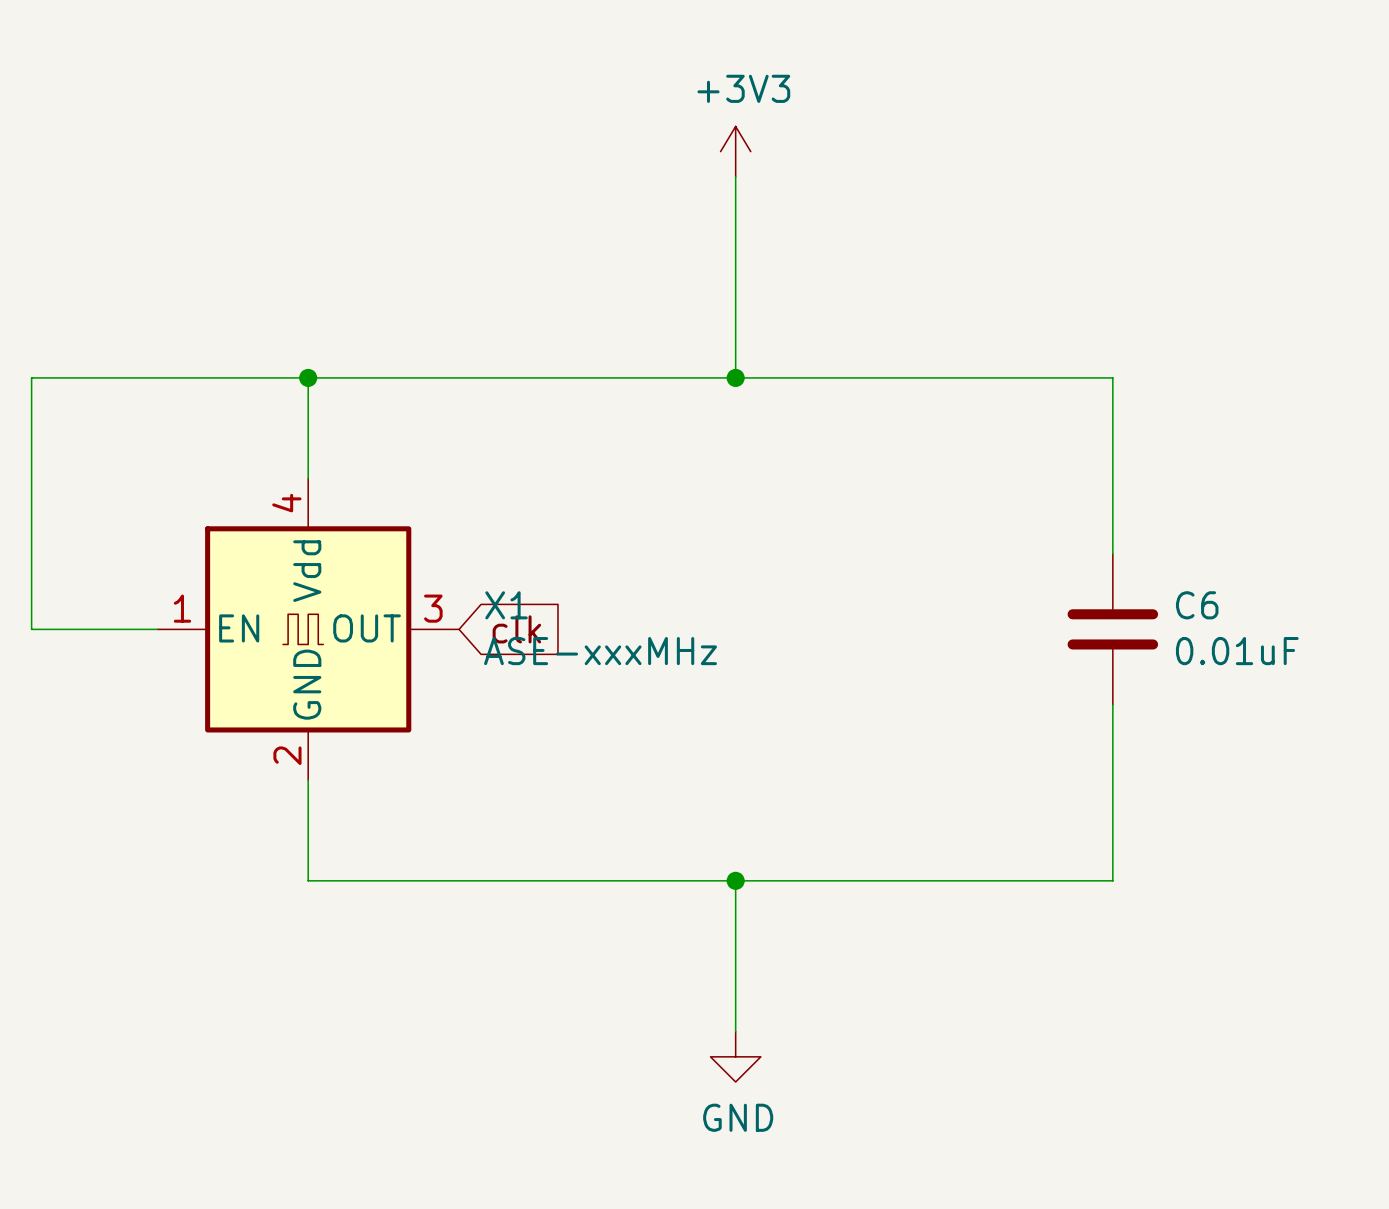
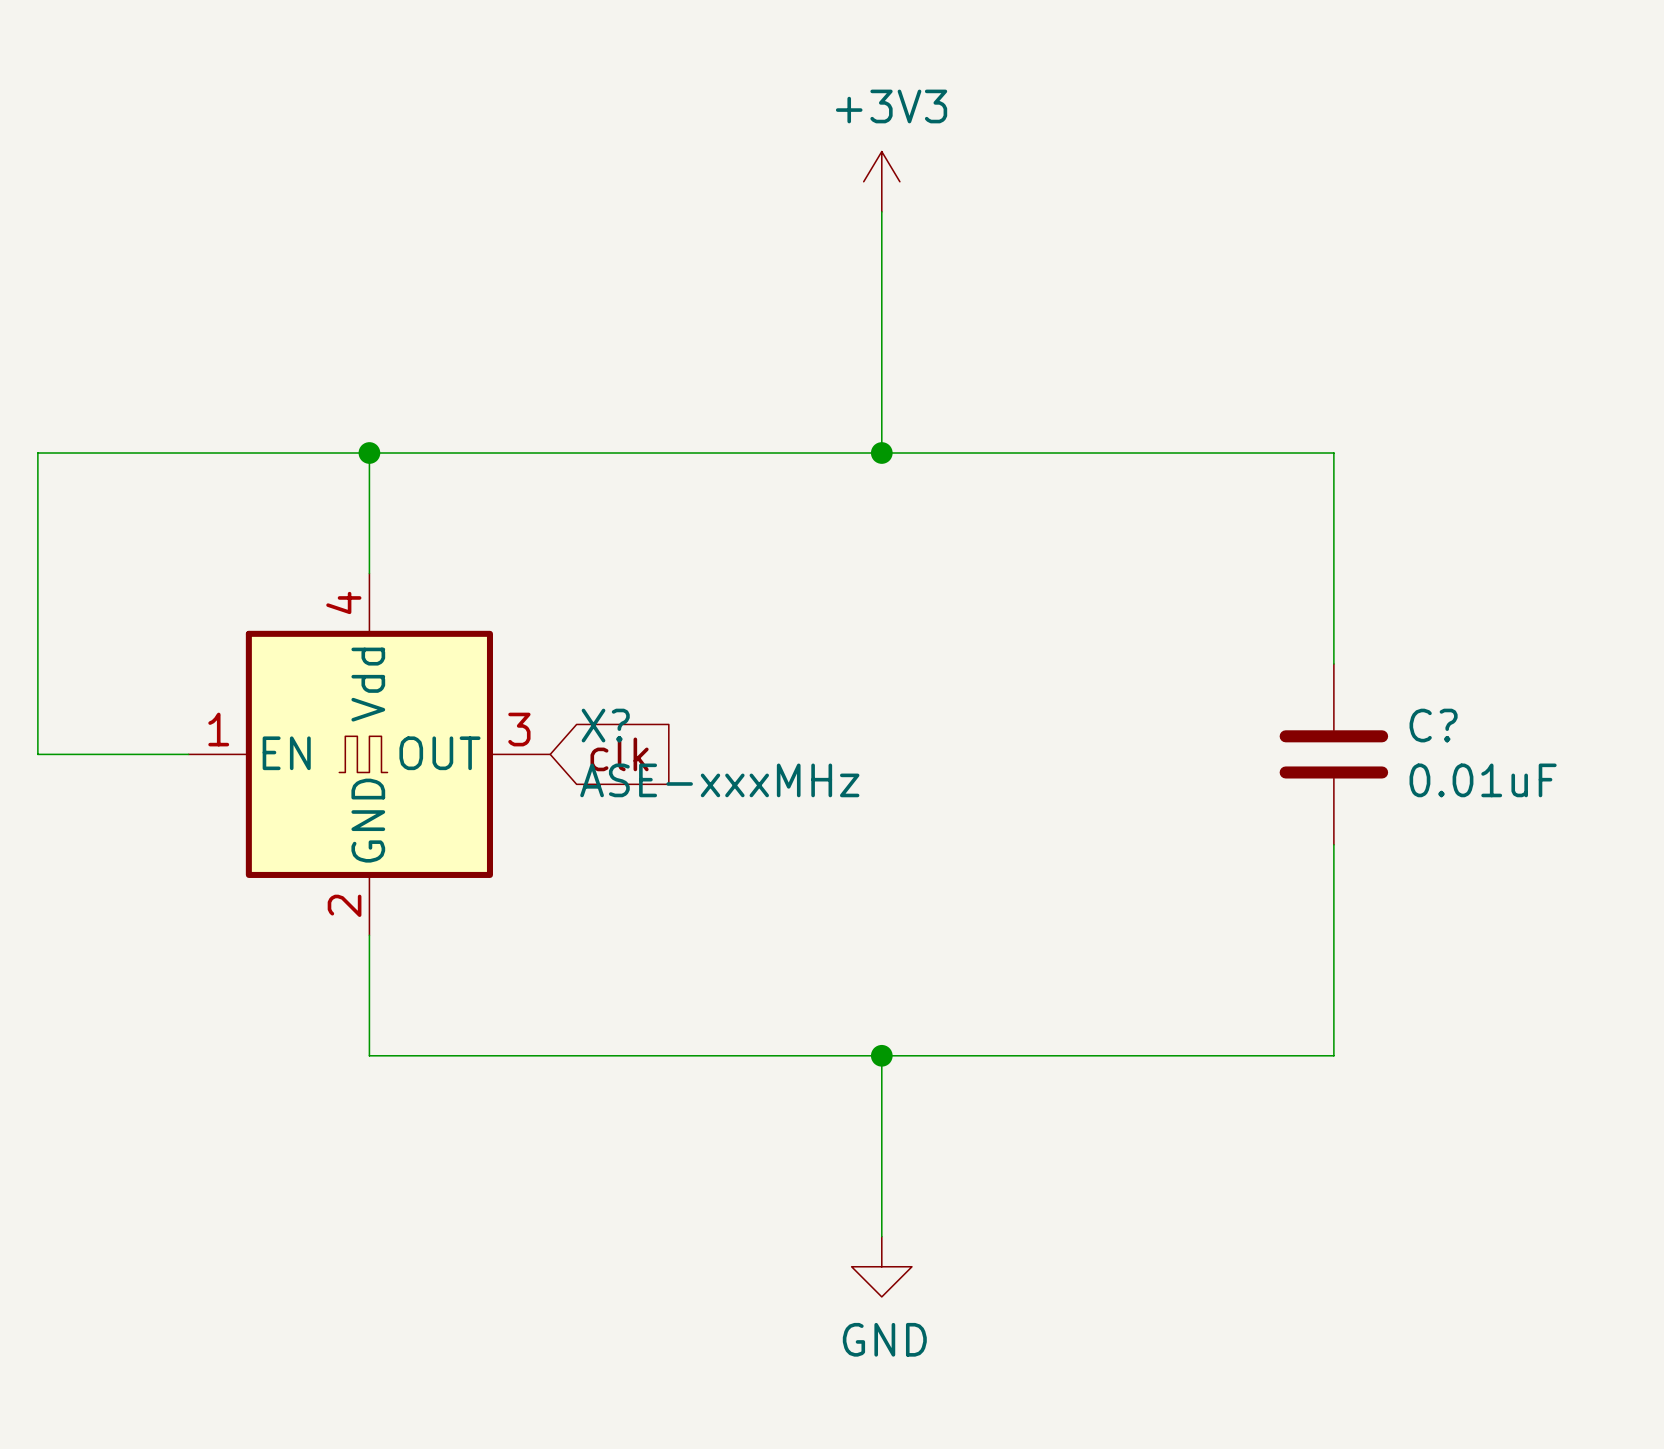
X1 name: X1 (506, 605) -> X? (605, 725)
C6 name: C6 (1197, 605) -> C? (1433, 725)

